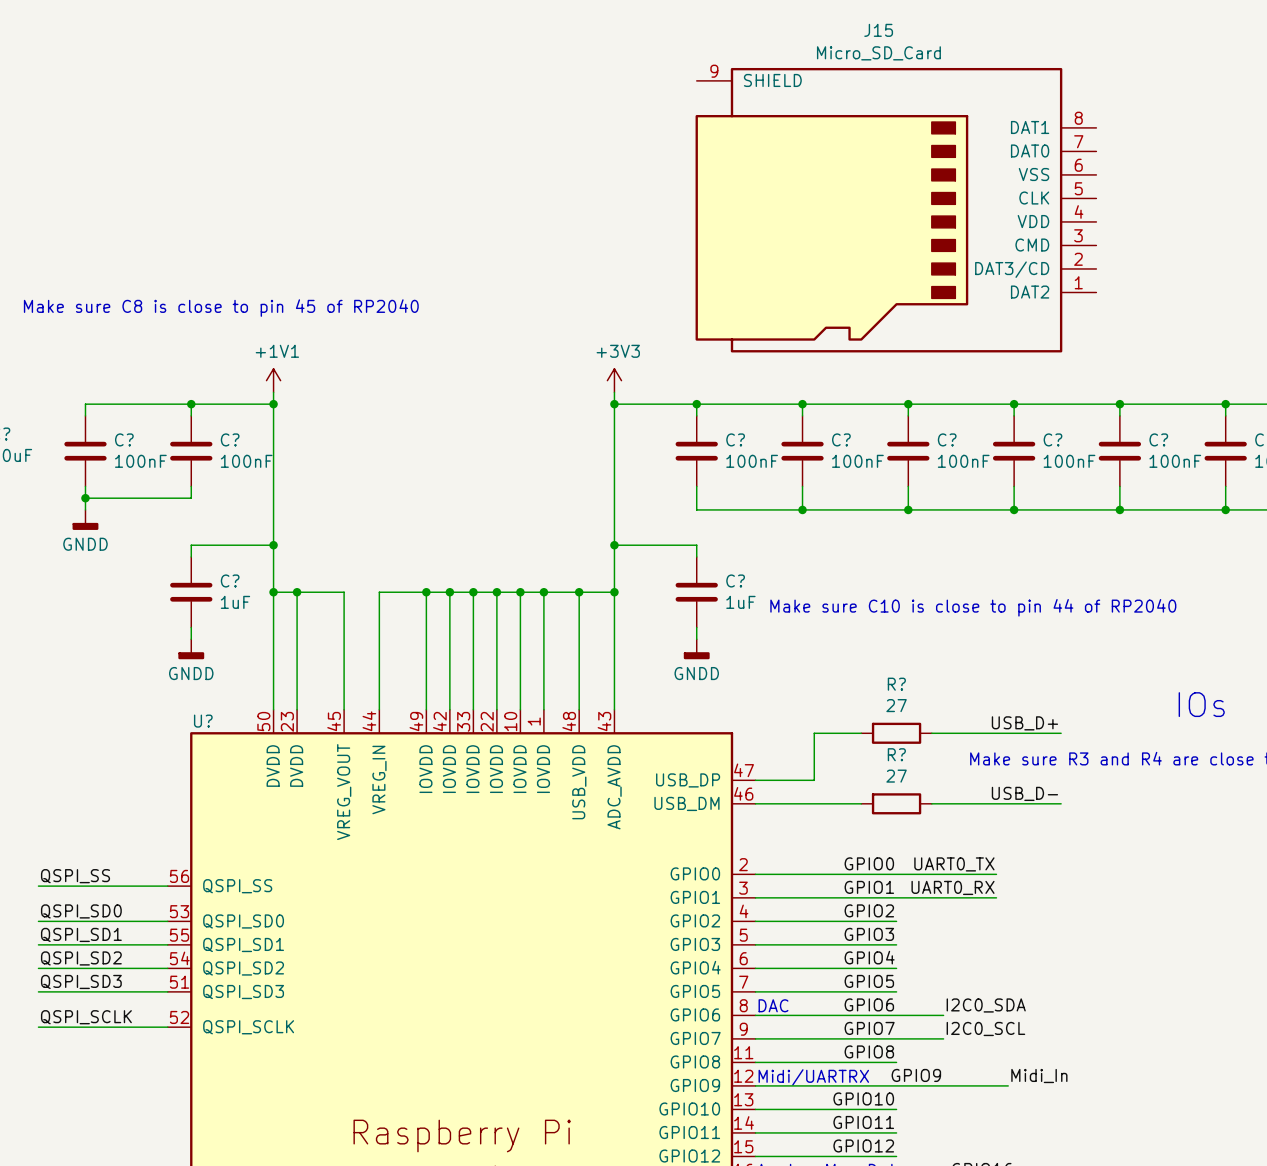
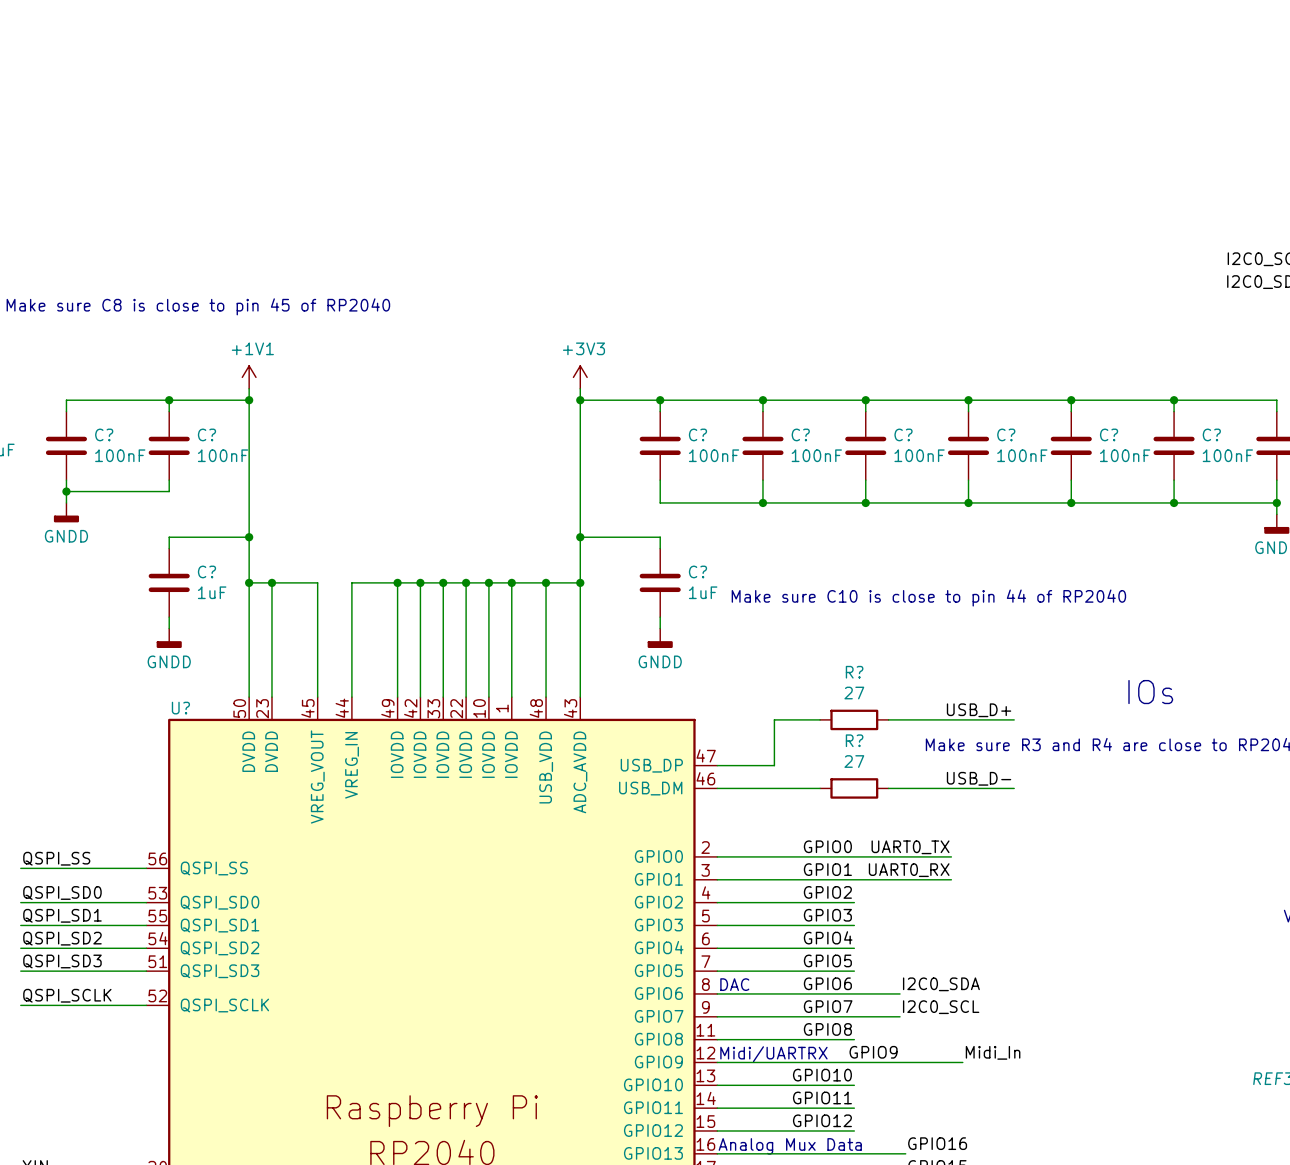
J15: Micro_SD_Card (895, 210) -> none

